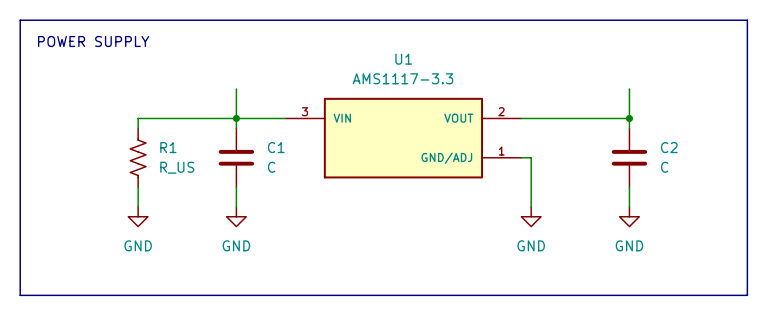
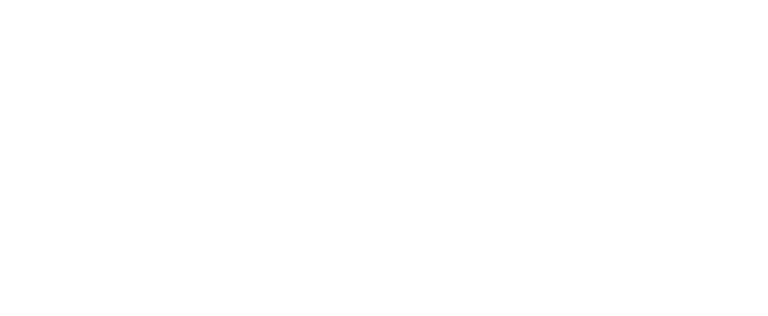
line: (20, 20) (747, 20) (747, 295) (20, 295) (20, 20) -> none
text: POWER SUPPLY (93, 41) -> none
wire: (236, 89) (236, 128) -> none
wire: (629, 89) (629, 128) -> none
junction: (236, 118) -> none
wire: (285, 118) (138, 118) (138, 128) -> none
wire: (521, 118) (629, 118) -> none
junction: (629, 118) -> none
U1: AMS1117-3.3 (403, 138) -> none
R1: R_US (138, 157) -> none
C1: C (236, 157) -> none
wire: (521, 157) (531, 157) (531, 206) -> none
C2: C (629, 157) -> none
wire: (138, 187) (138, 206) -> none
wire: (236, 187) (236, 206) -> none
wire: (629, 187) (629, 206) -> none
power symbol: GND (138, 216) -> none
power symbol: GND (236, 216) -> none
power symbol: GND (531, 216) -> none
power symbol: GND (629, 216) -> none

